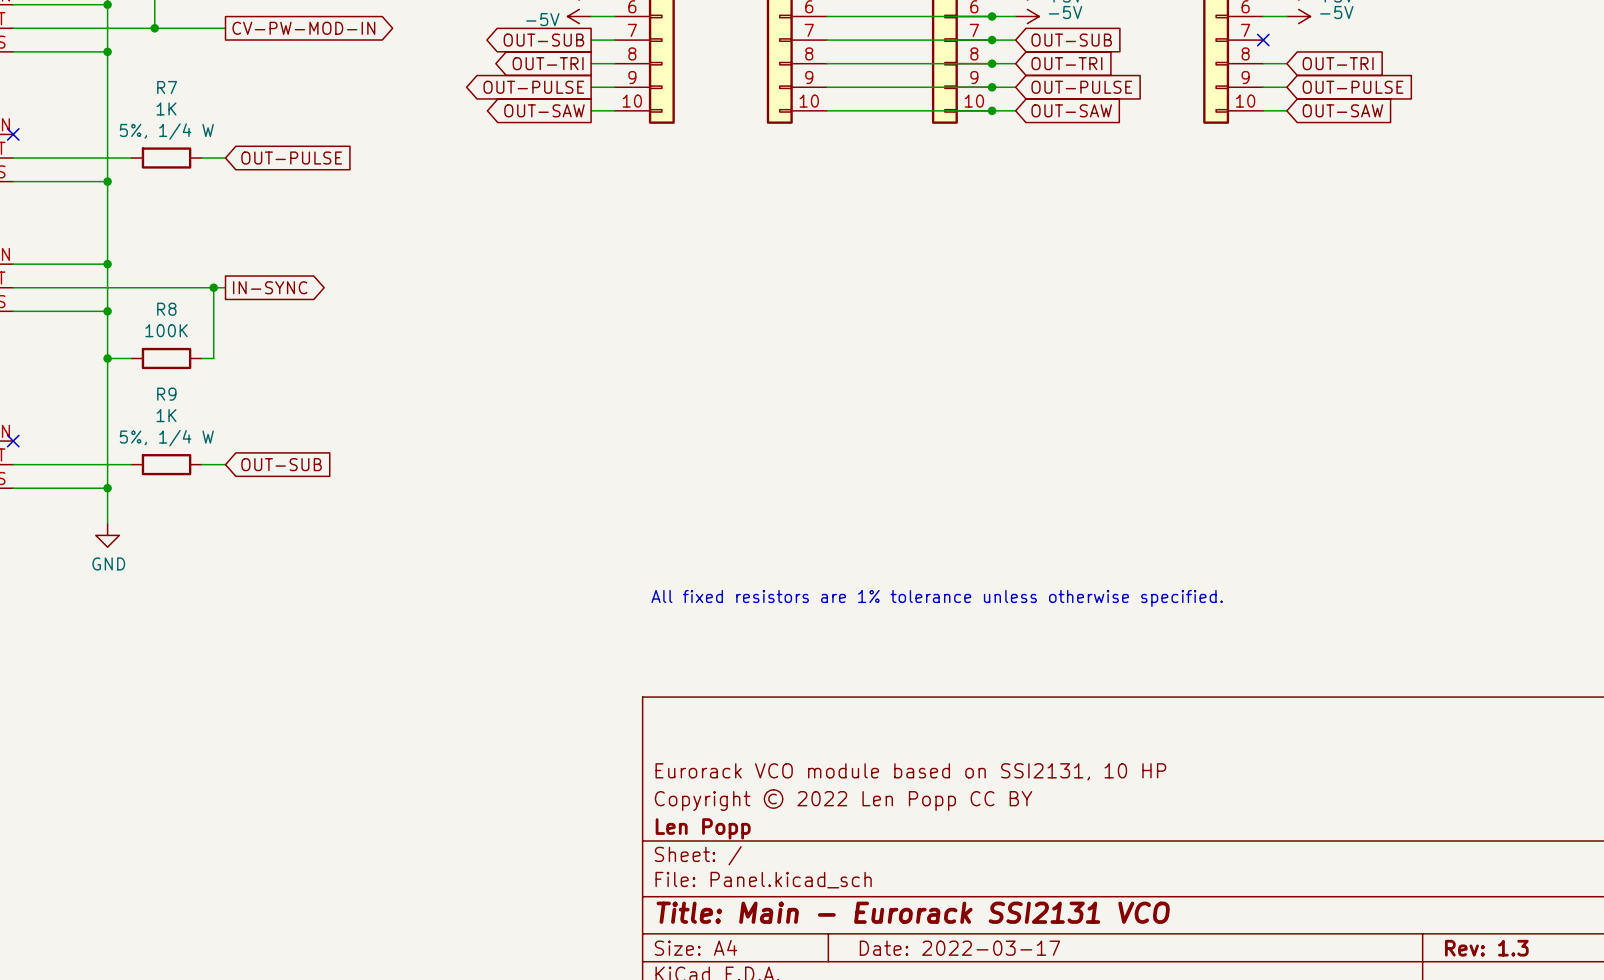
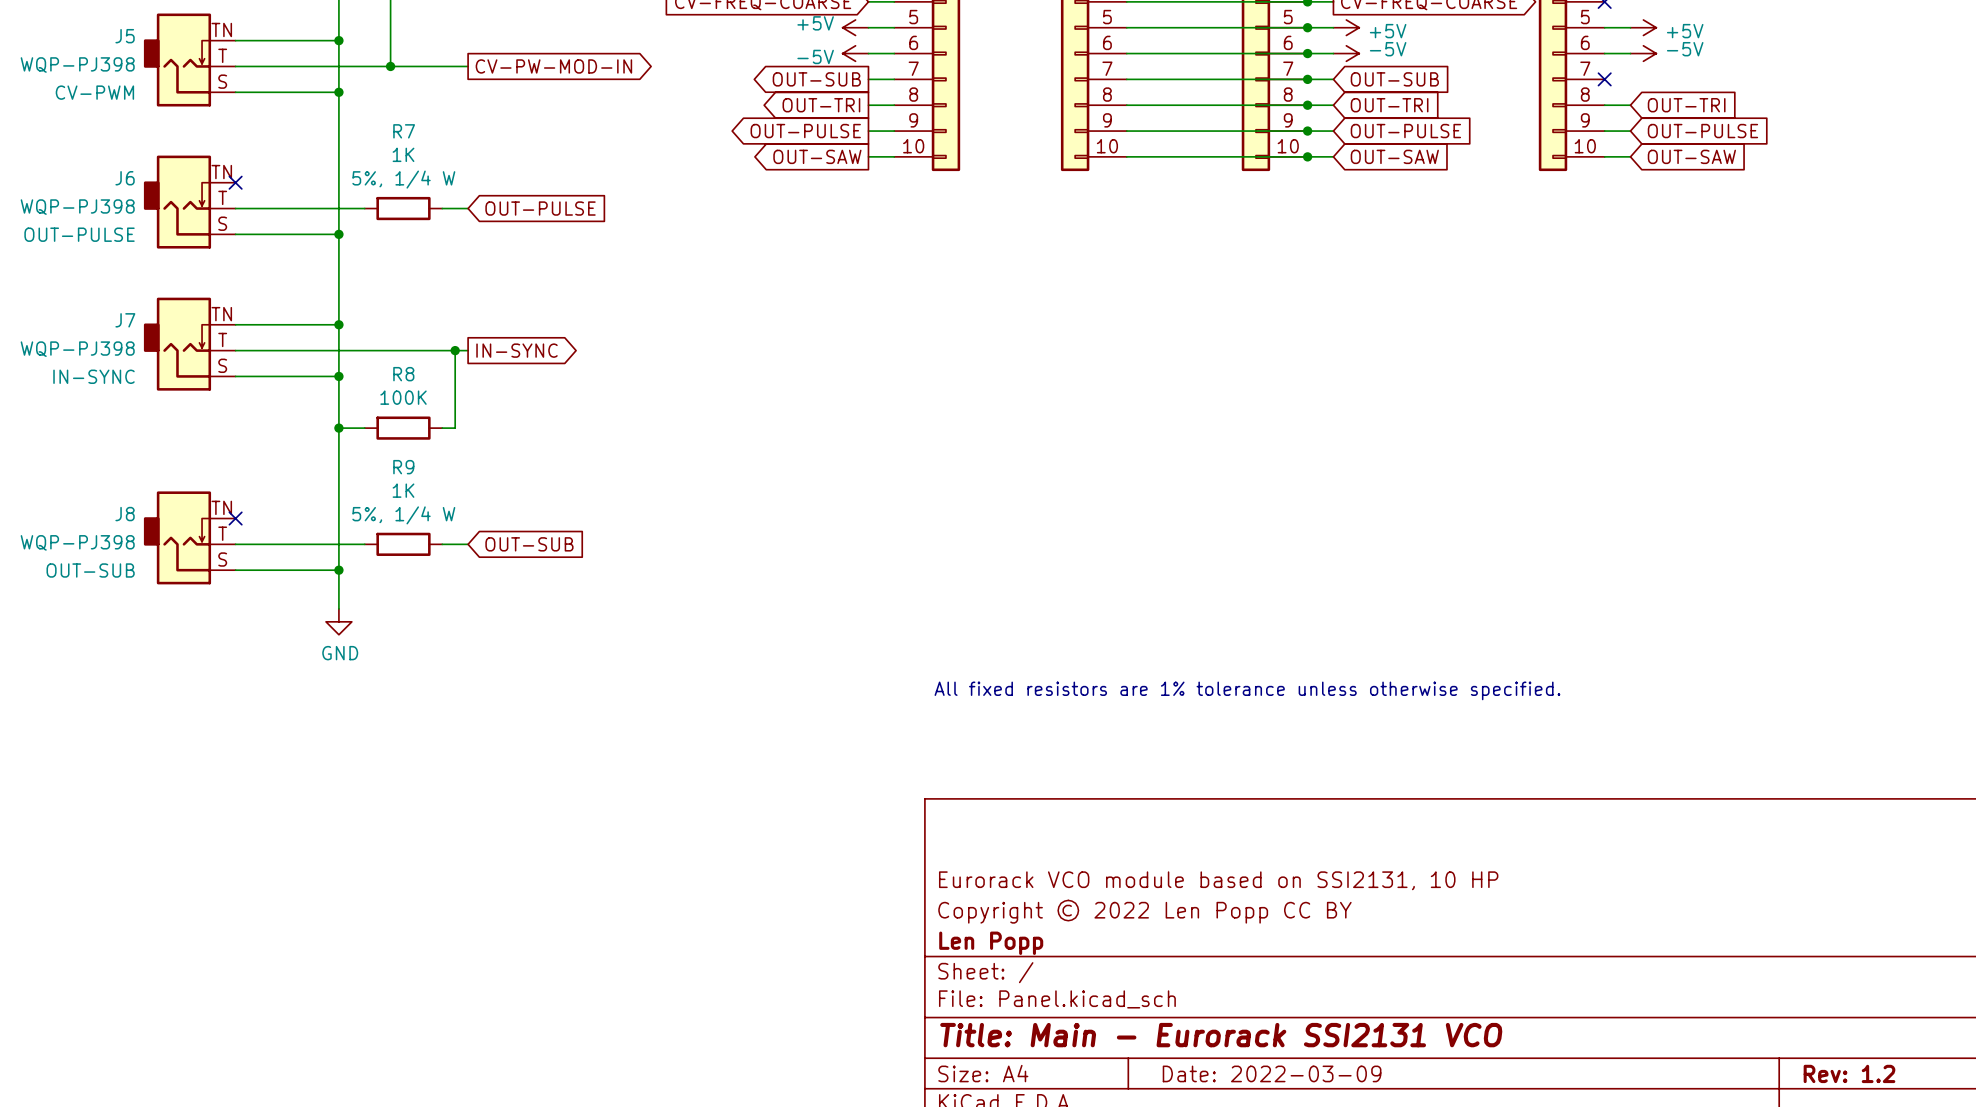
title block: Date: 2022-03-17 (959, 948) -> Date: 2022-03-09 (1272, 1073)
title block: Rev: 1.3 (1486, 948) -> Rev: 1.2 (1849, 1073)

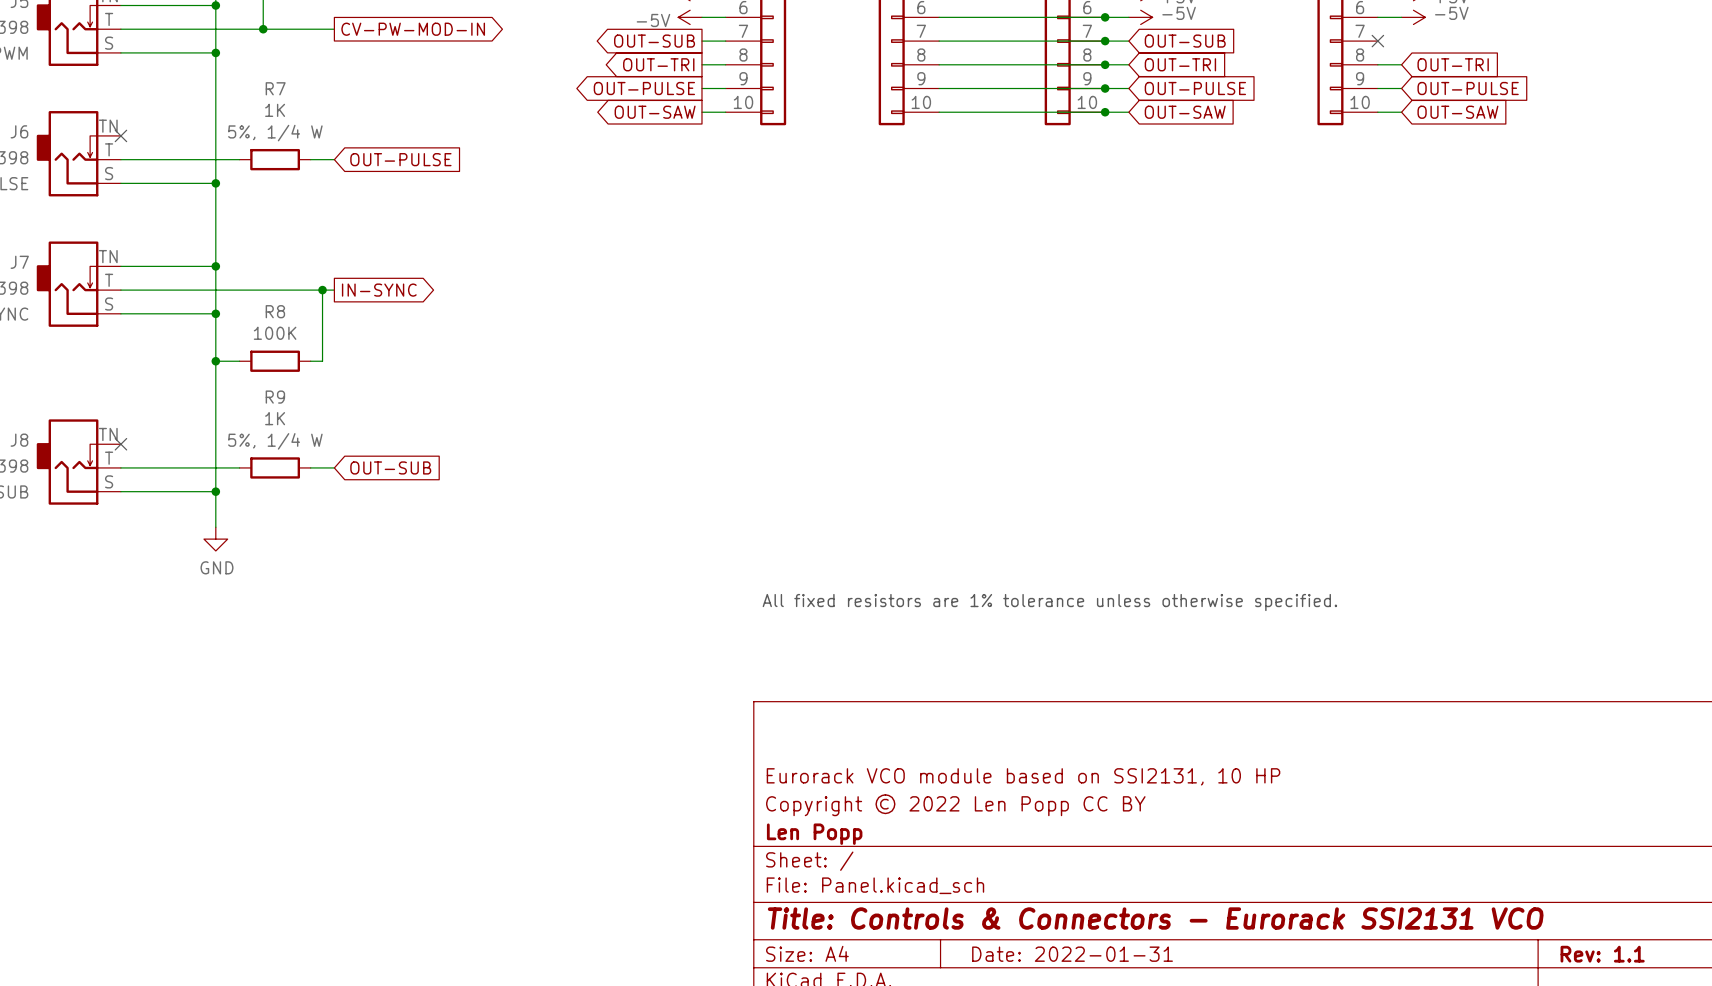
title block: Title: Main - Eurorack SSI2131 VCO (1221, 1035) -> Title: Controls & Connectors - Eurorack SSI2131 VCO (1155, 918)
title block: Date: 2022-03-09 (1272, 1073) -> Date: 2022-01-31 (1072, 954)
title block: Rev: 1.2 (1849, 1073) -> Rev: 1.1 (1602, 954)

